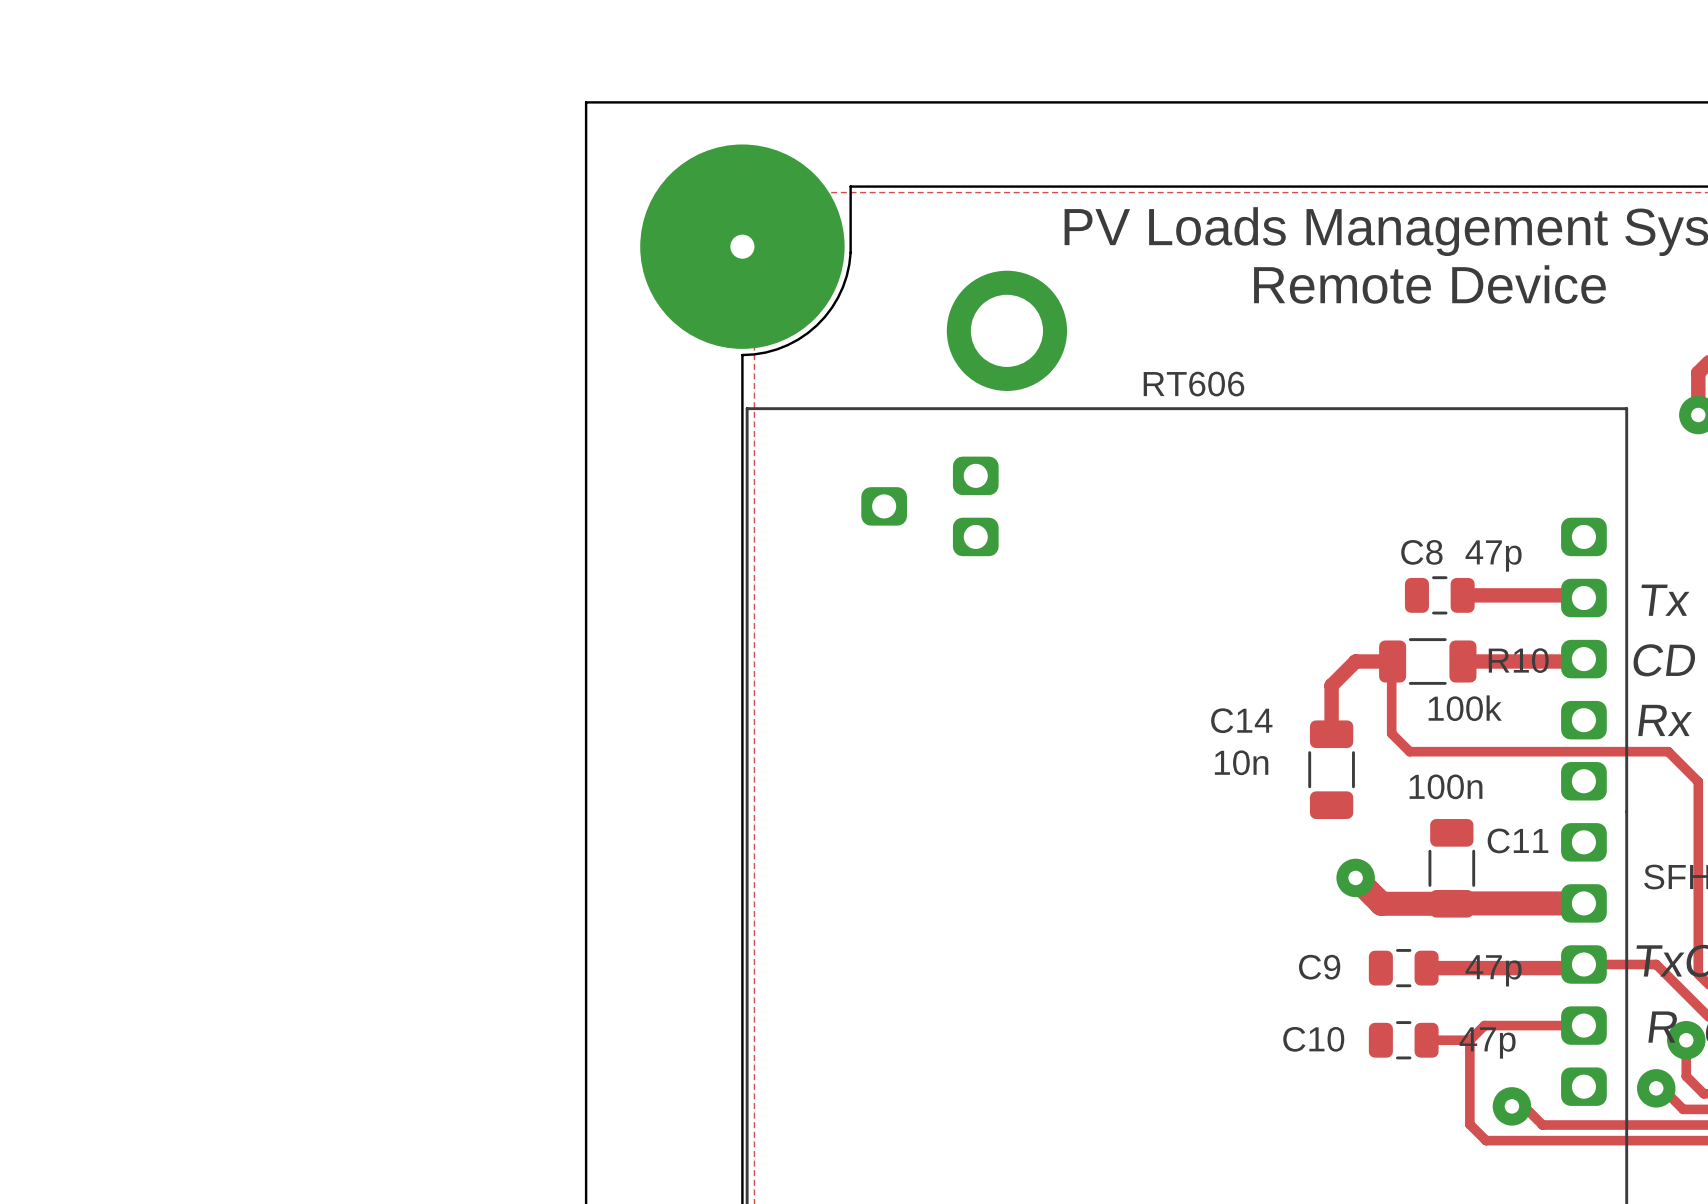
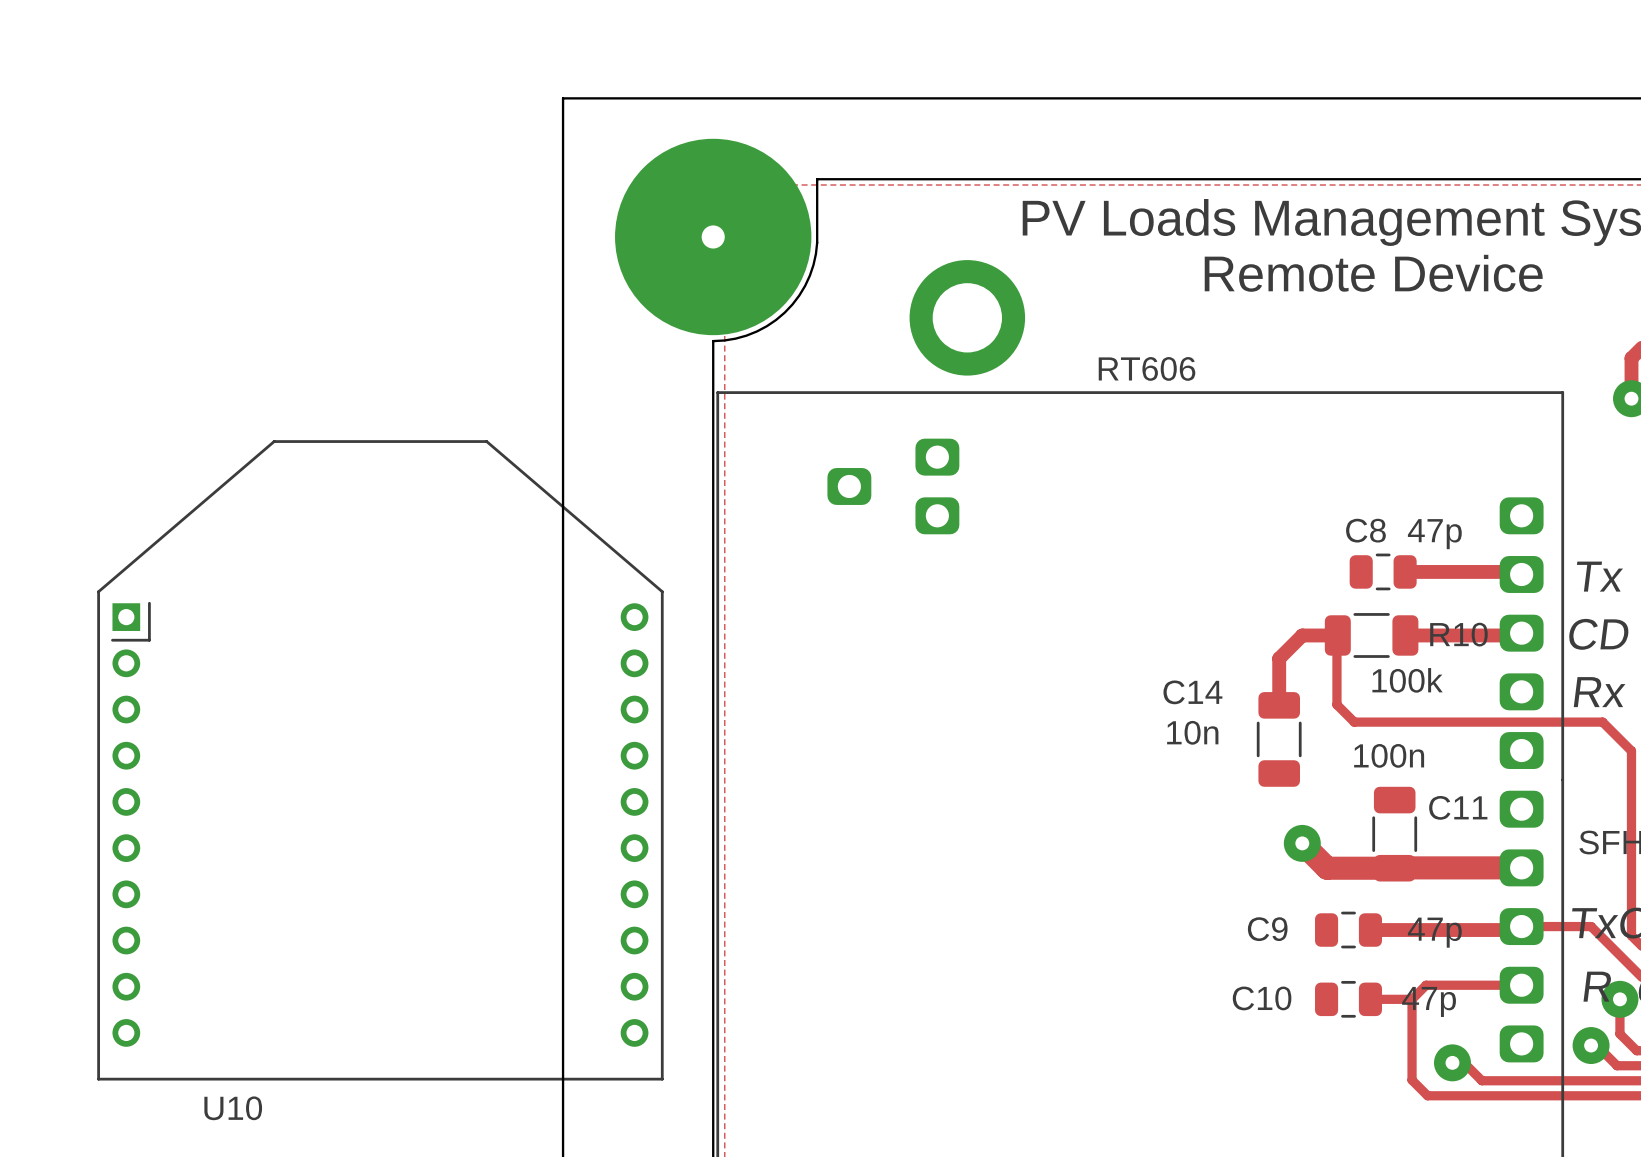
U10: none -> (380, 760)

